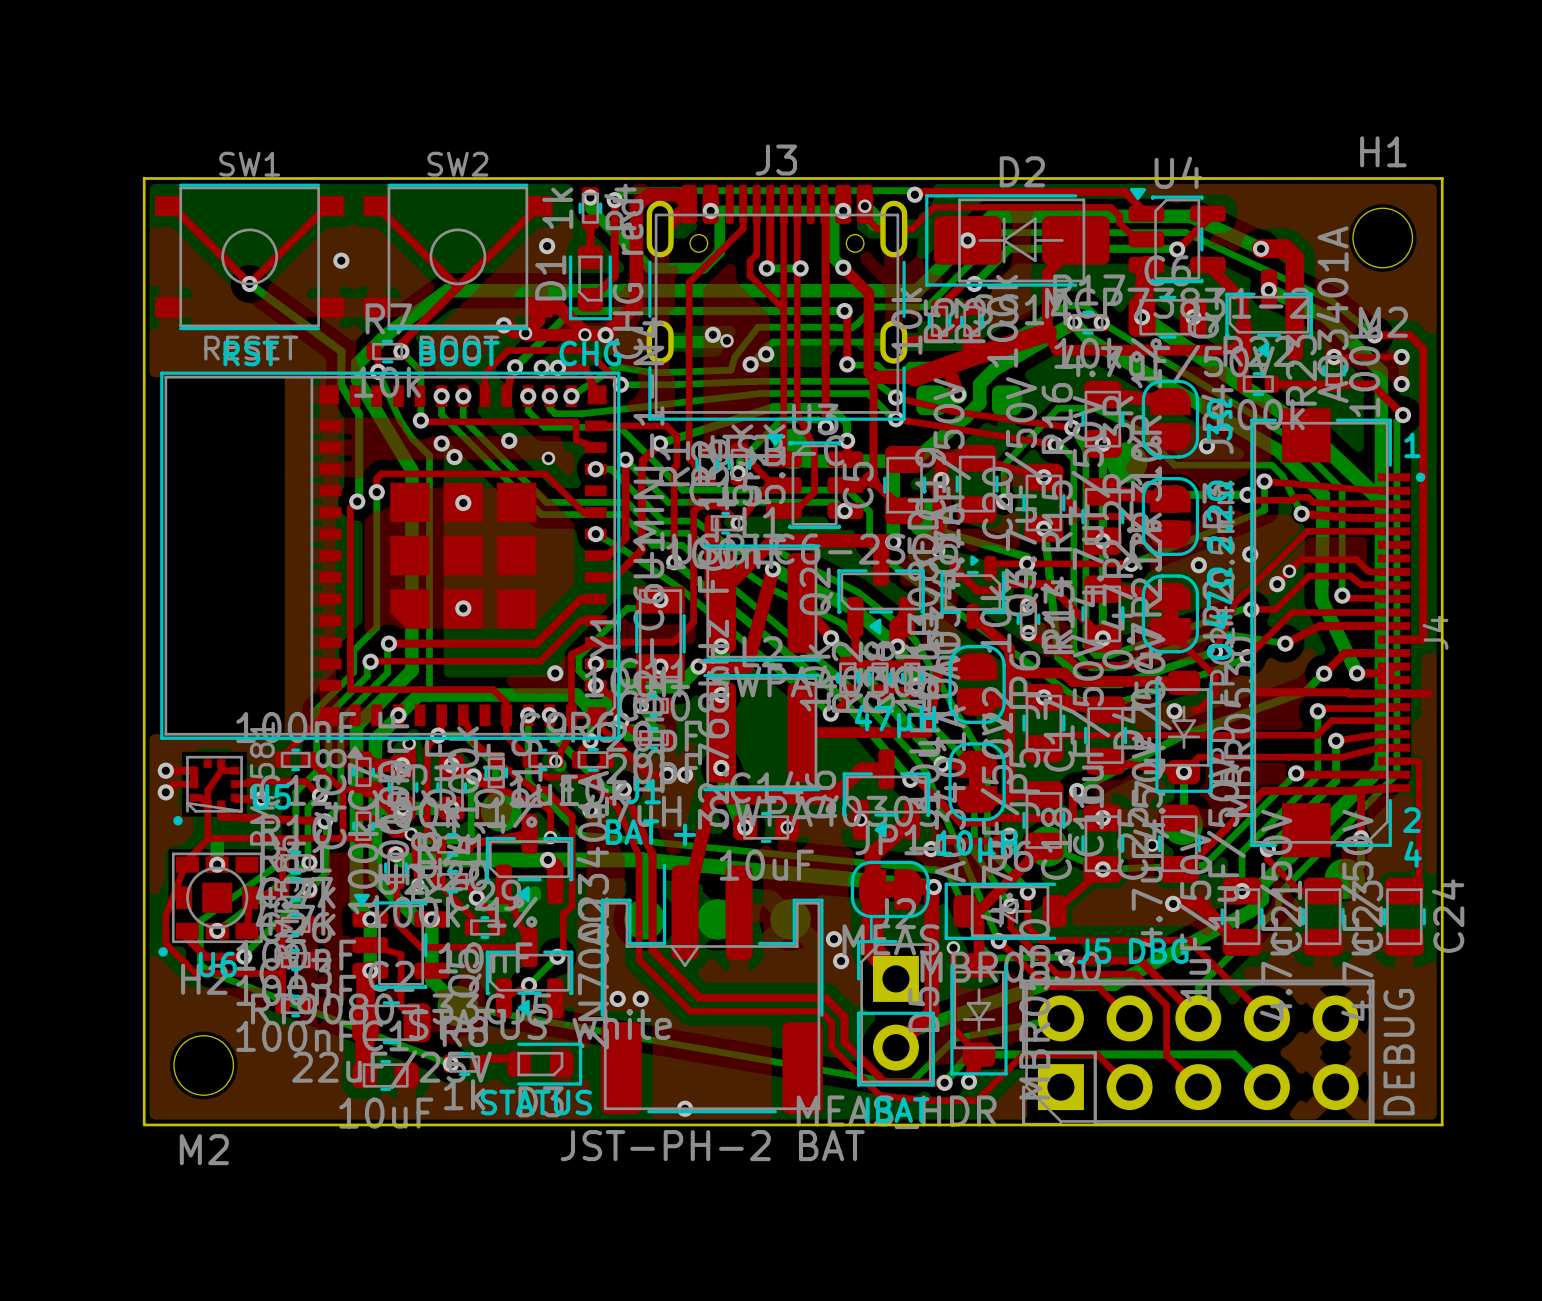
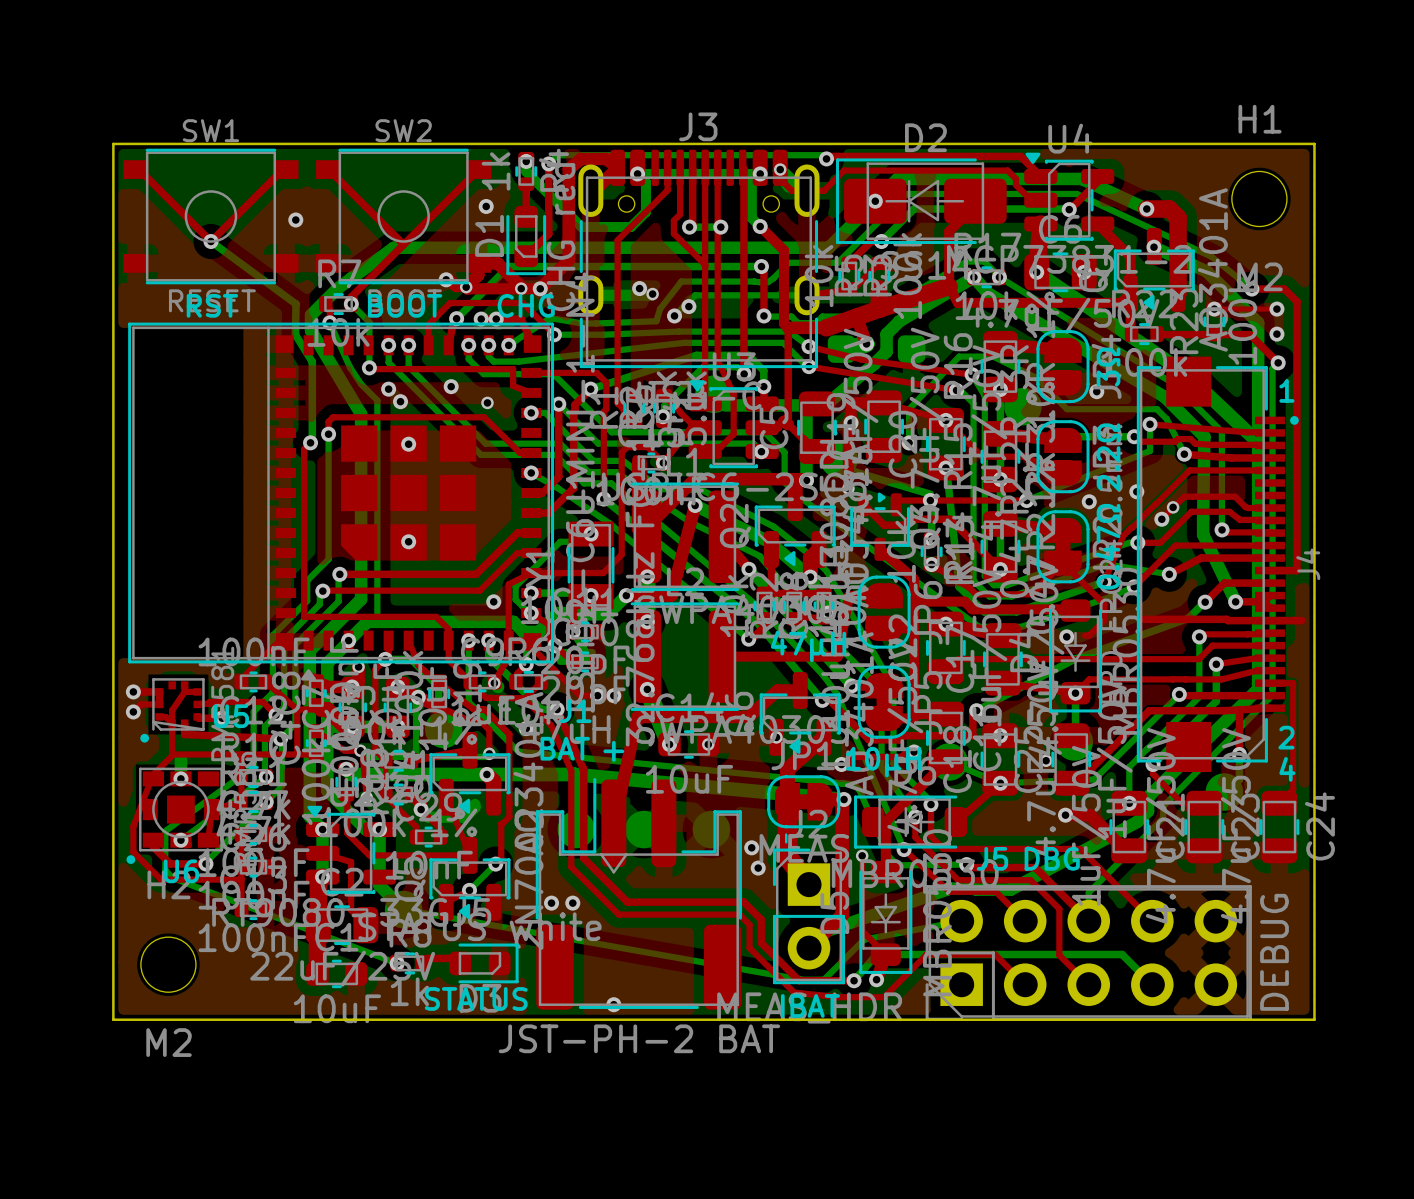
line: (871, 916) (871, 924) -> none
line: (871, 933) (871, 941) -> none

